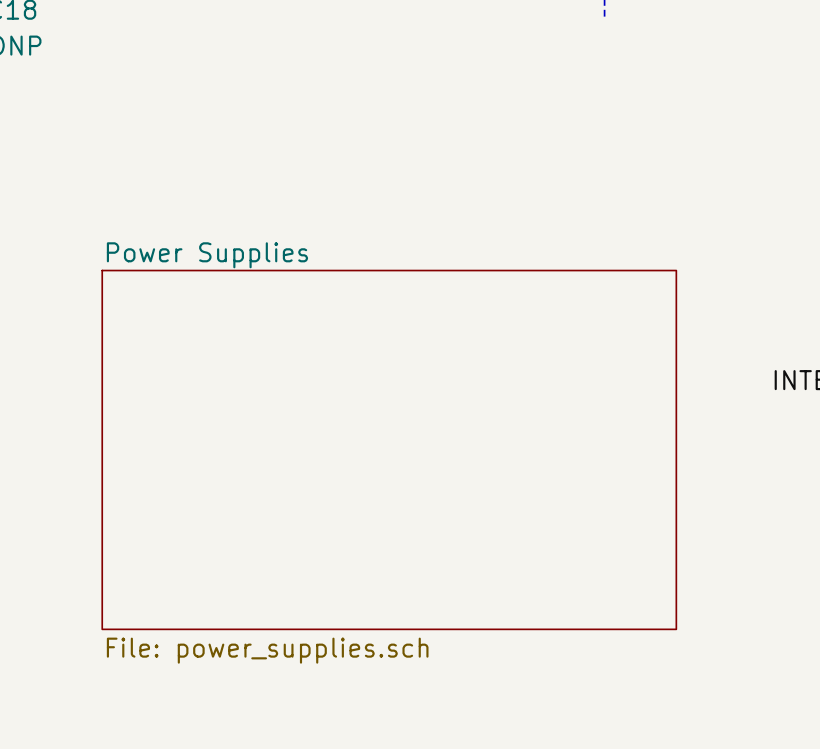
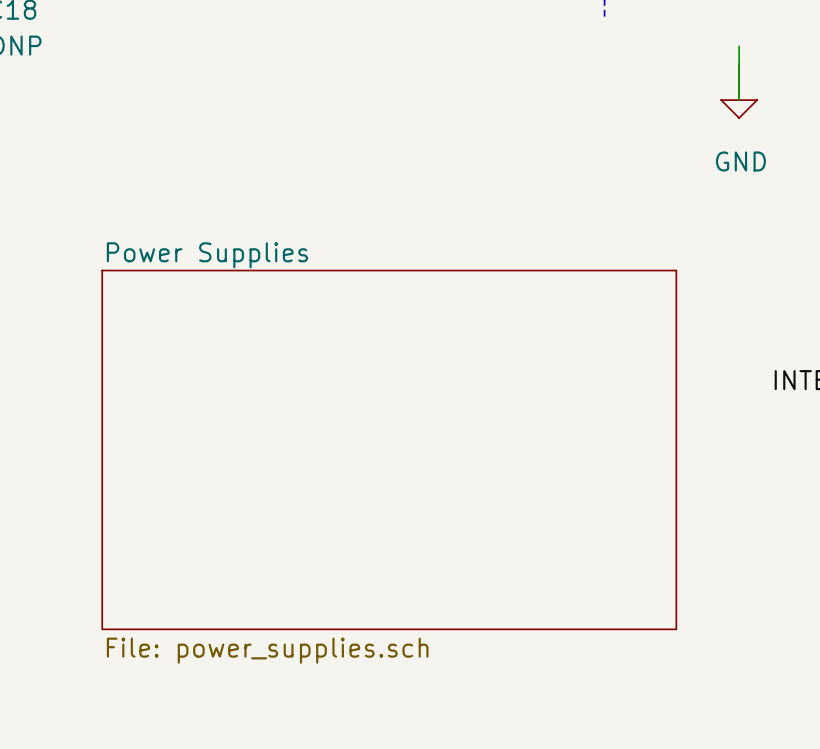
wire: none -> (739, 46) (739, 100)
power symbol: none -> GND (739, 91)

